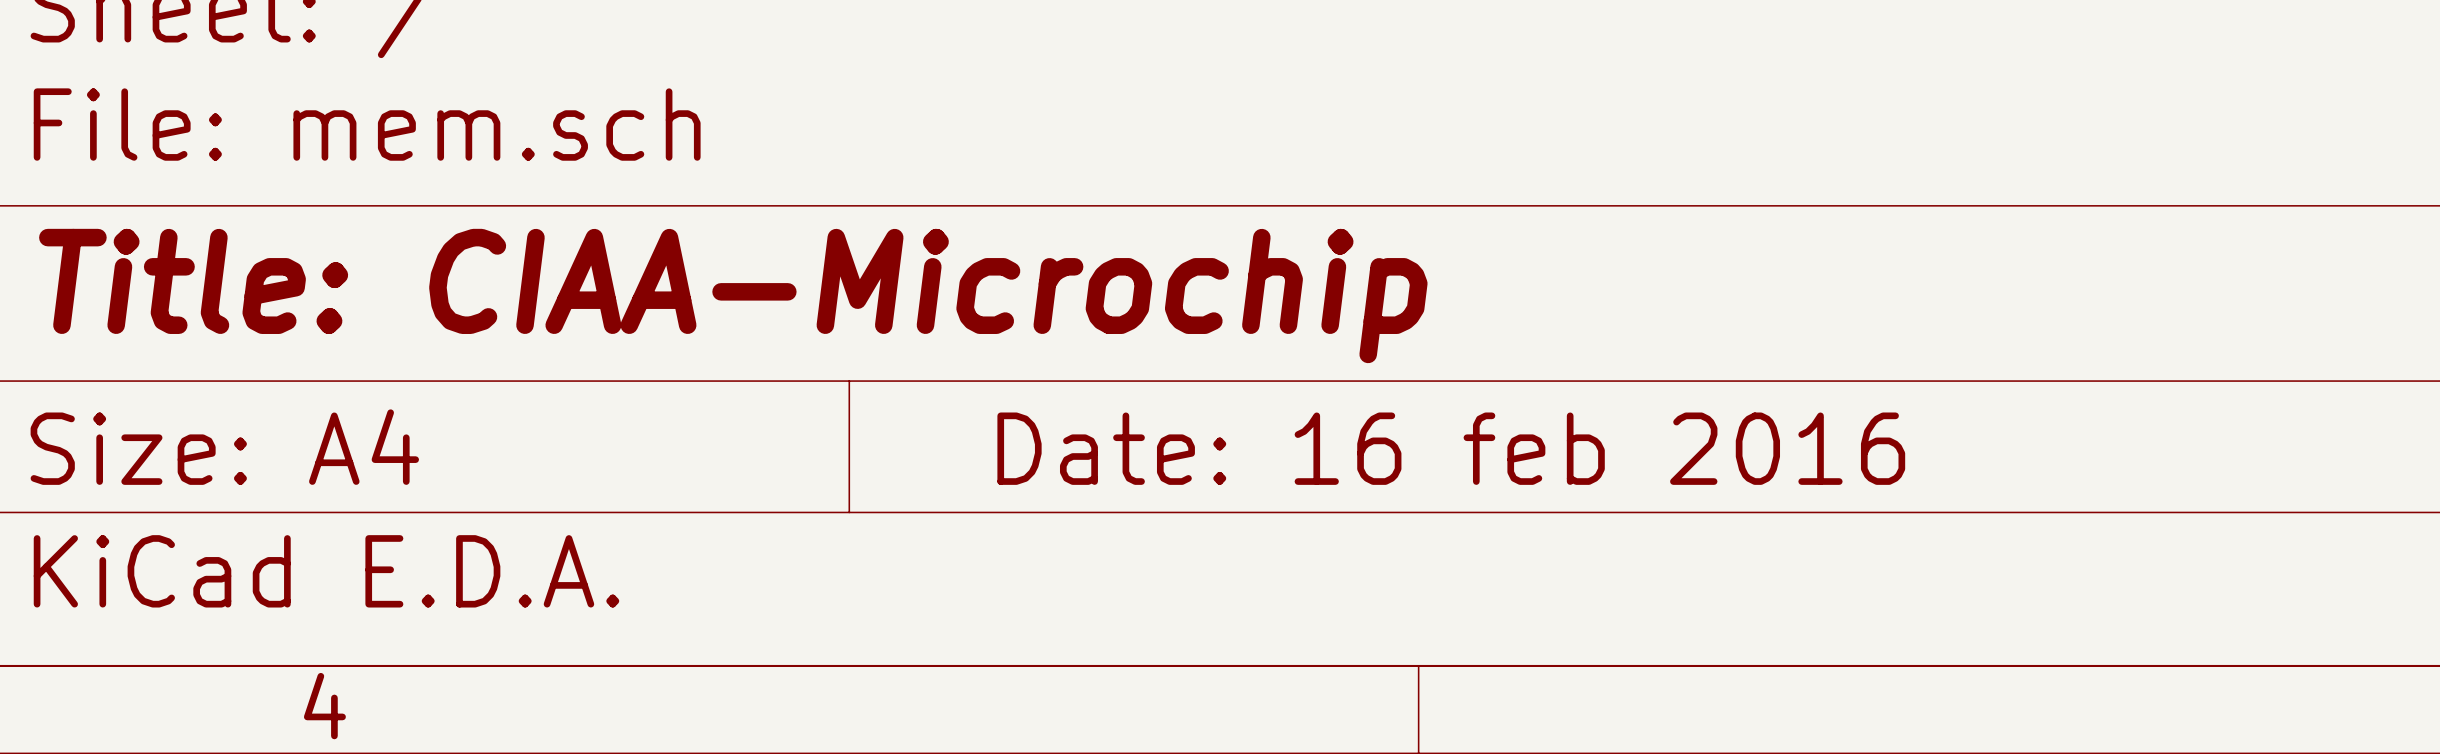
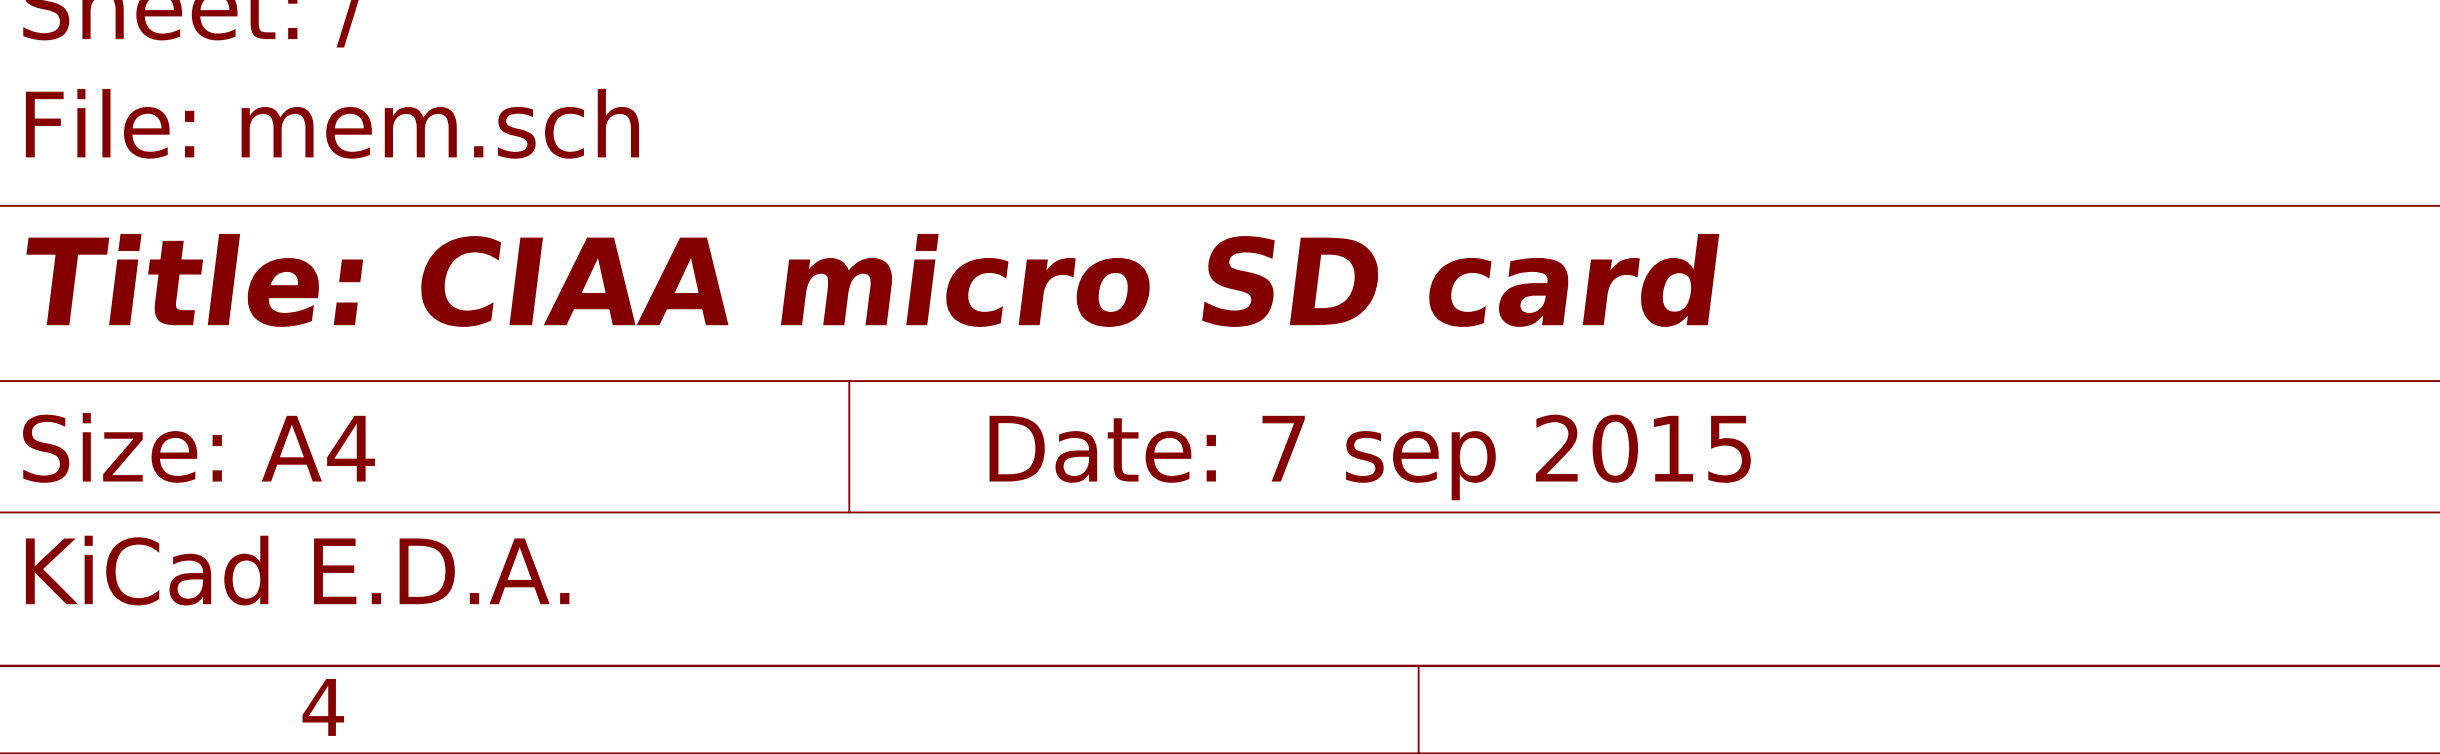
title block: Title: CIAA-Microchip (733, 296) -> Title: CIAA micro SD card (872, 280)
title block: Date: 16 feb 2016 (1451, 448) -> Date: 7 sep 2015 (1370, 457)

